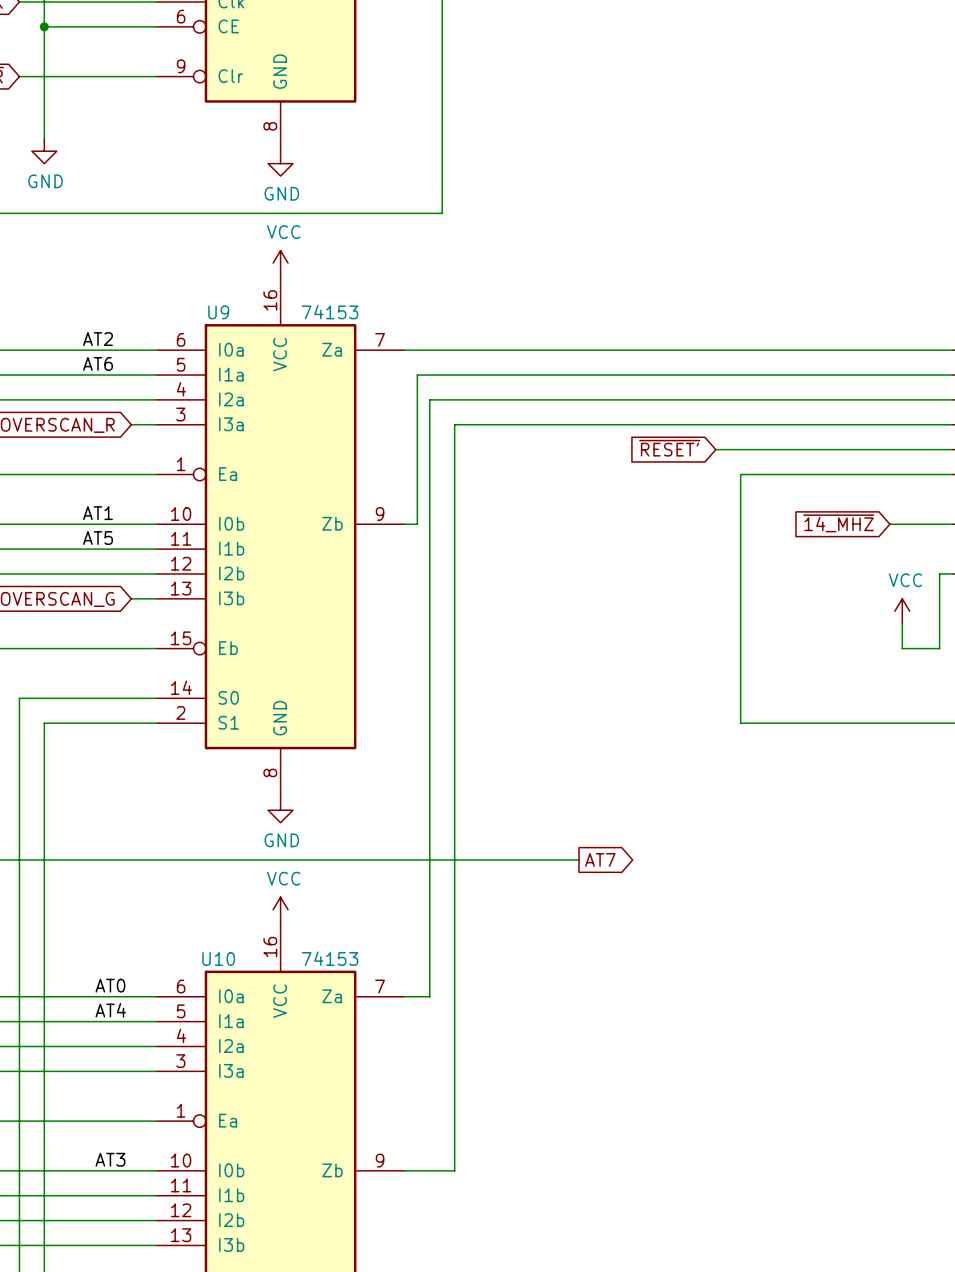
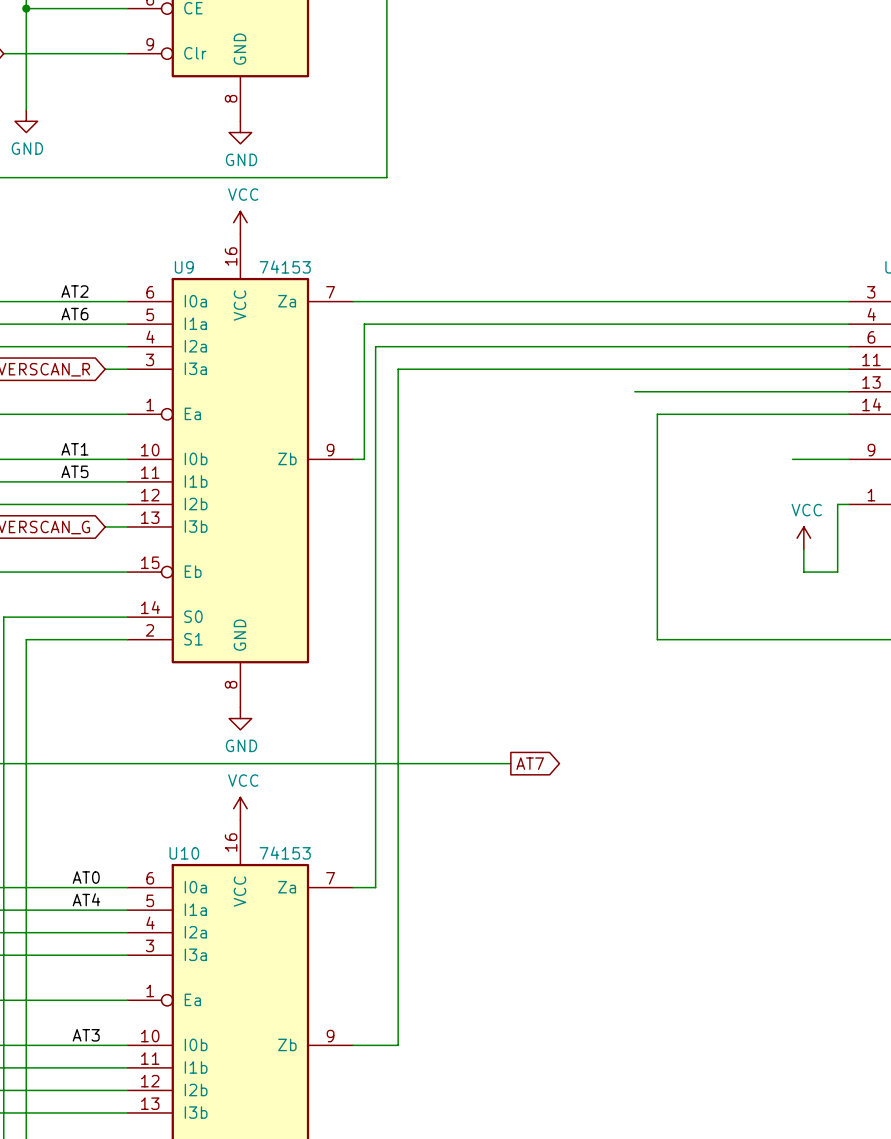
global label: ~{RESET'} (669, 448) -> none
global label: ~{14_MHZ} (838, 523) -> none

